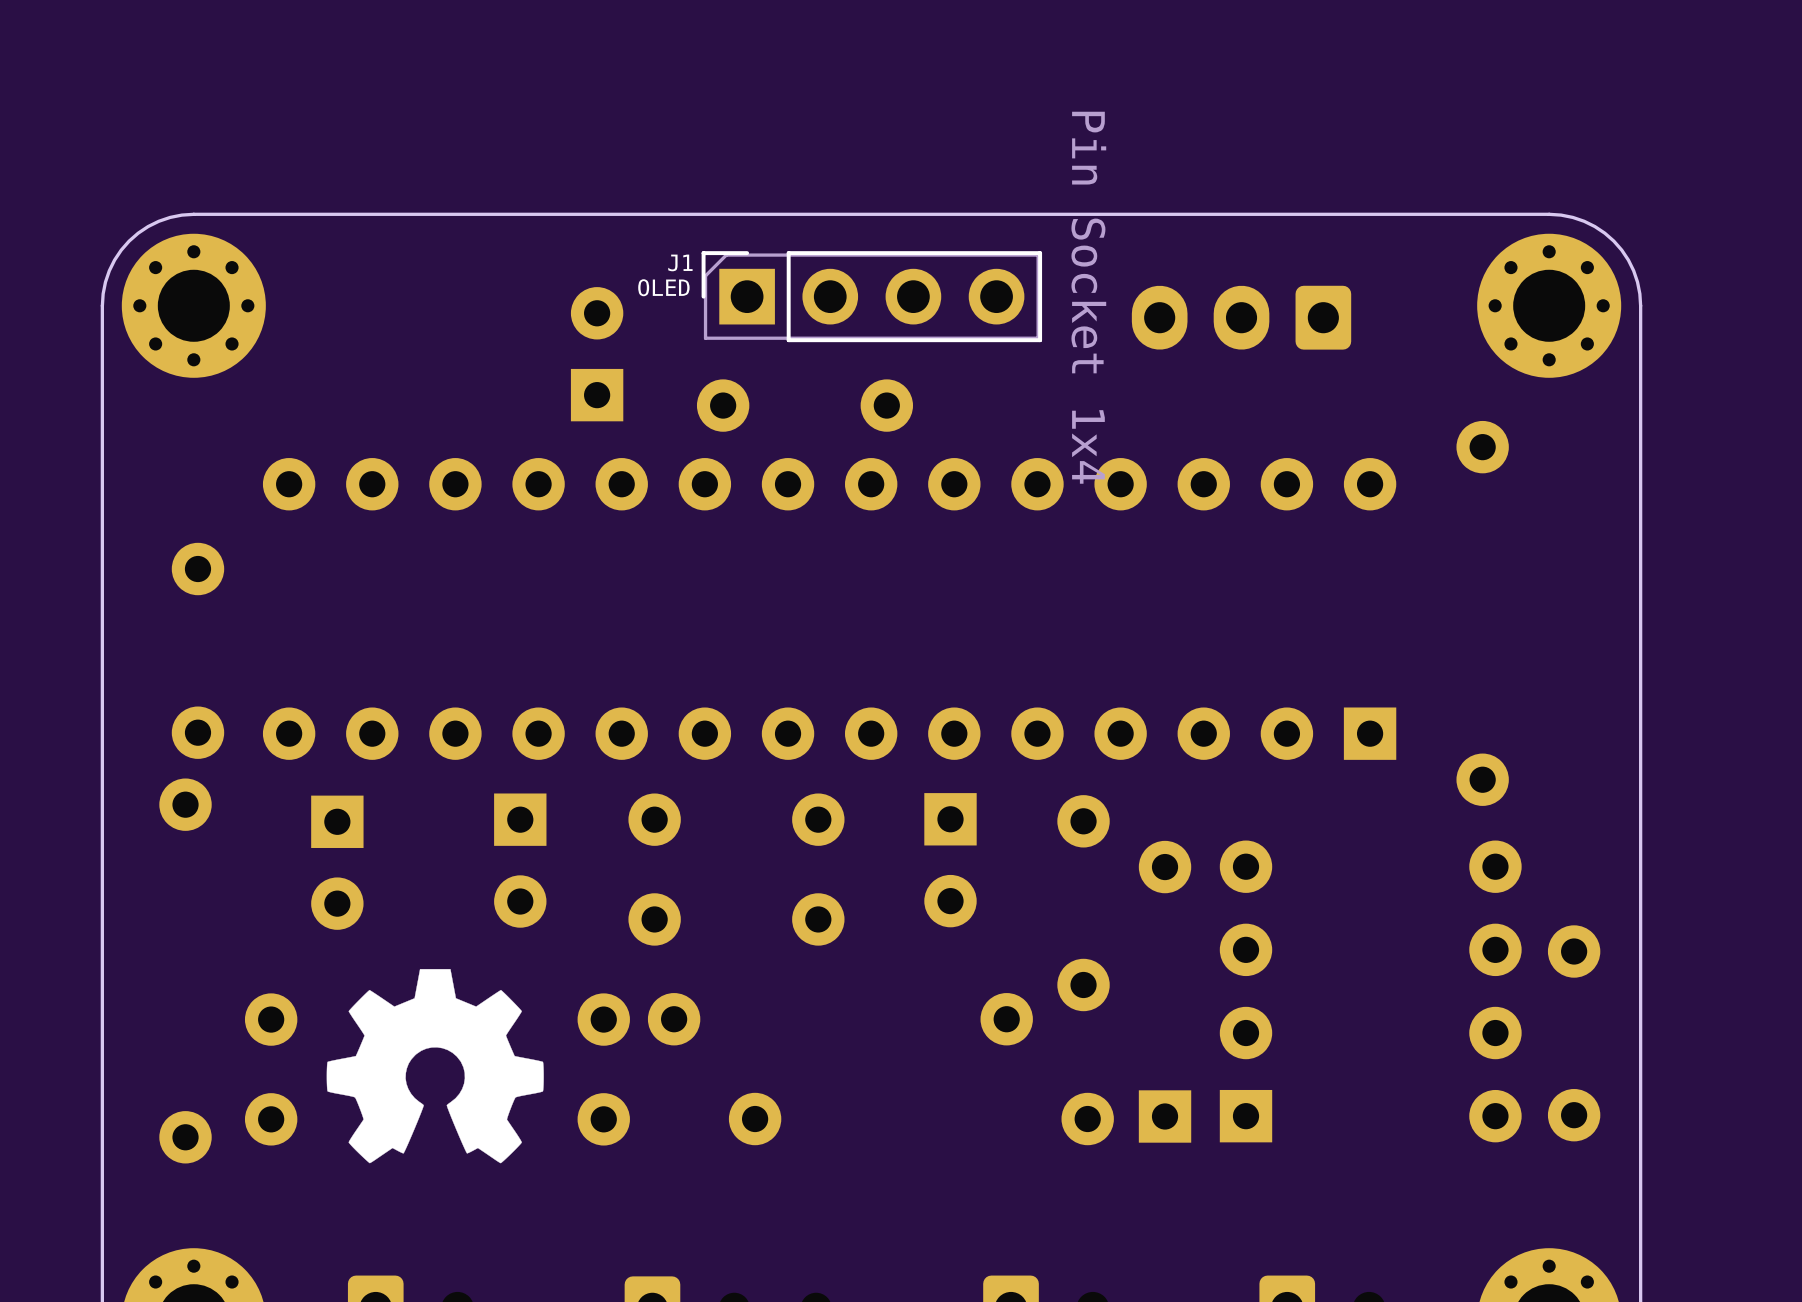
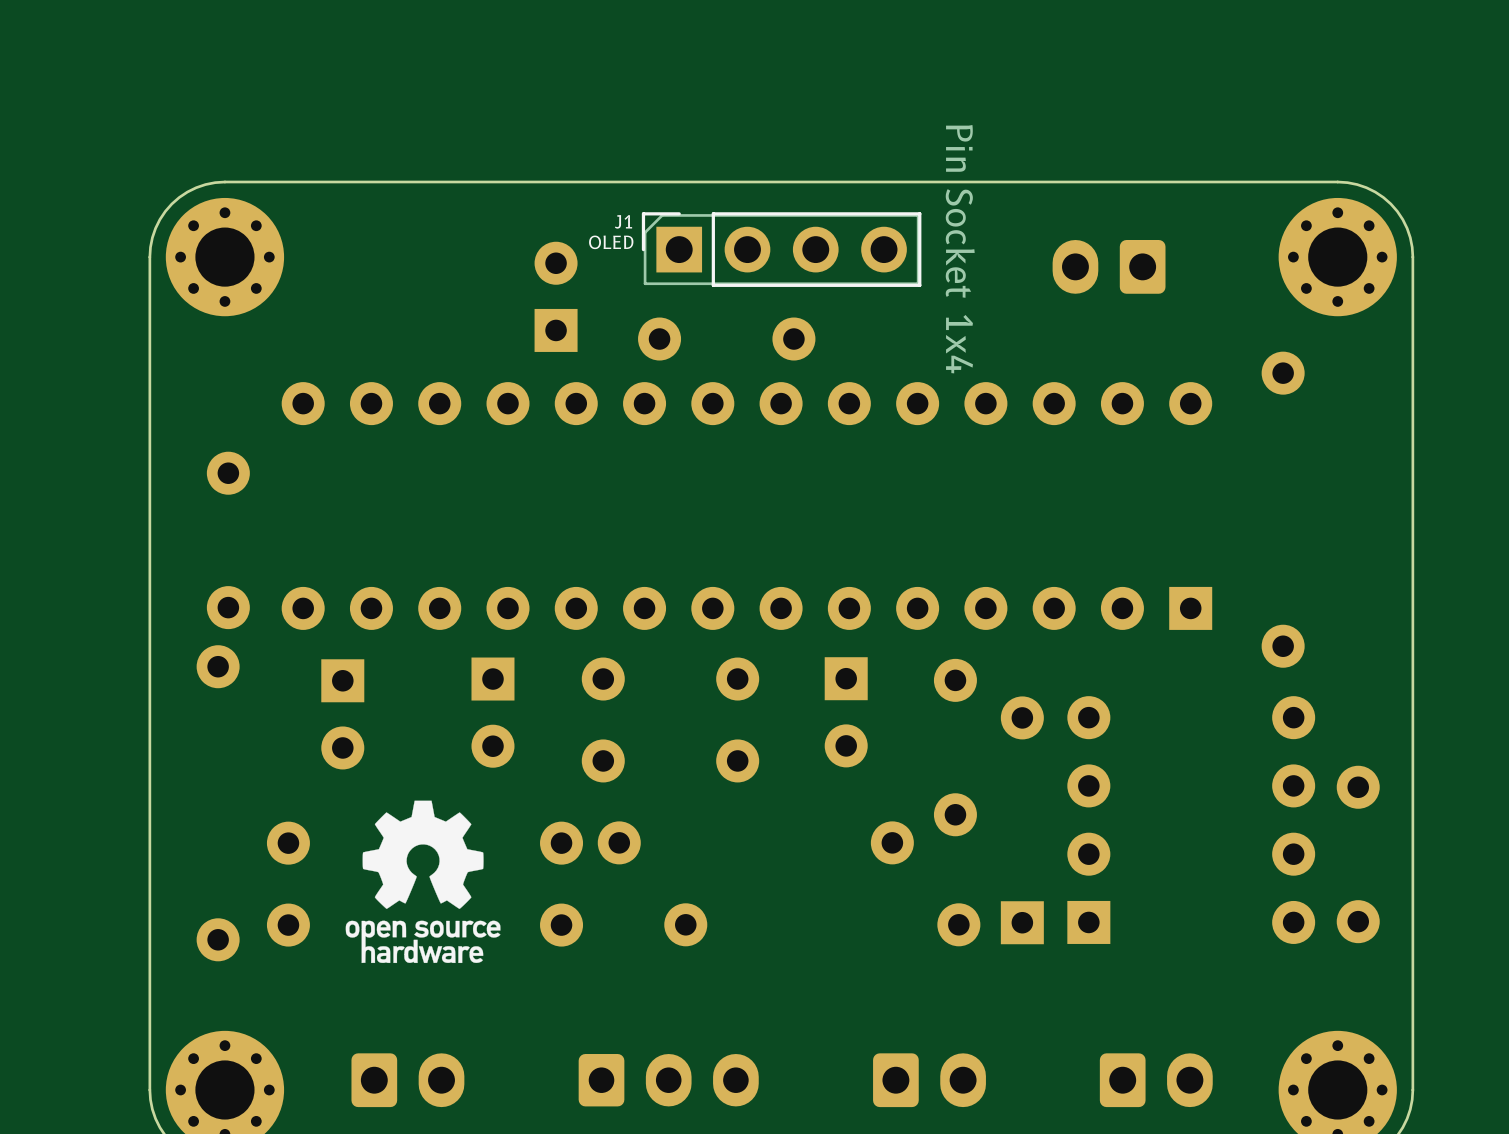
part footprint: [1131, 285, 1352, 350] -> [1052, 240, 1166, 294]
drawing shape: [326, 969, 544, 1164] -> [345, 800, 501, 964]

